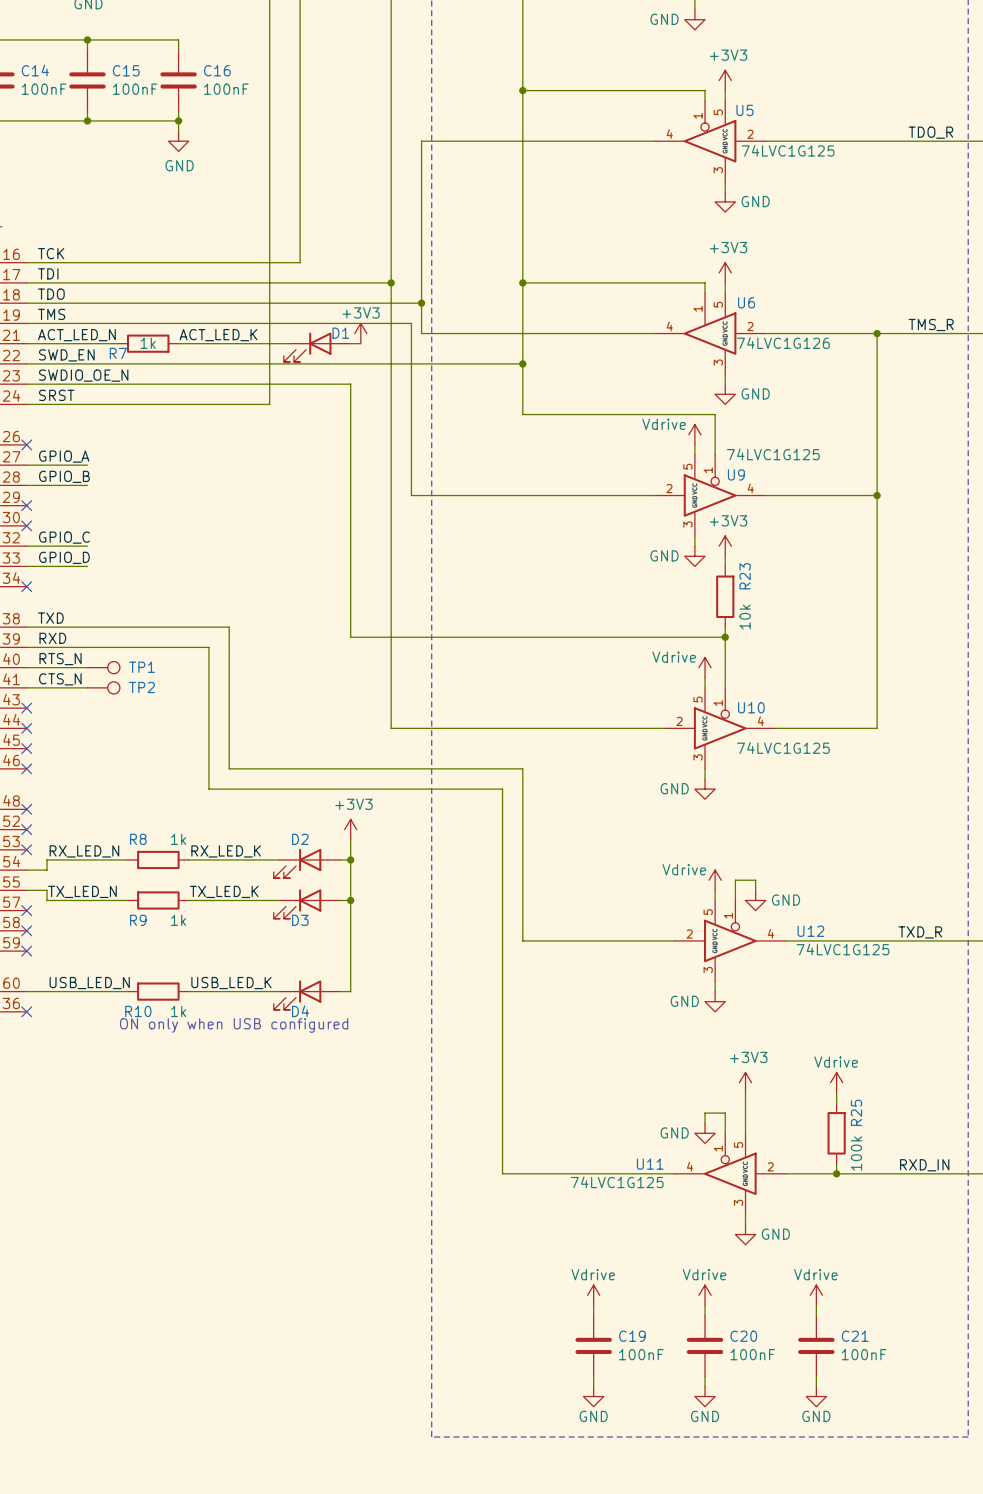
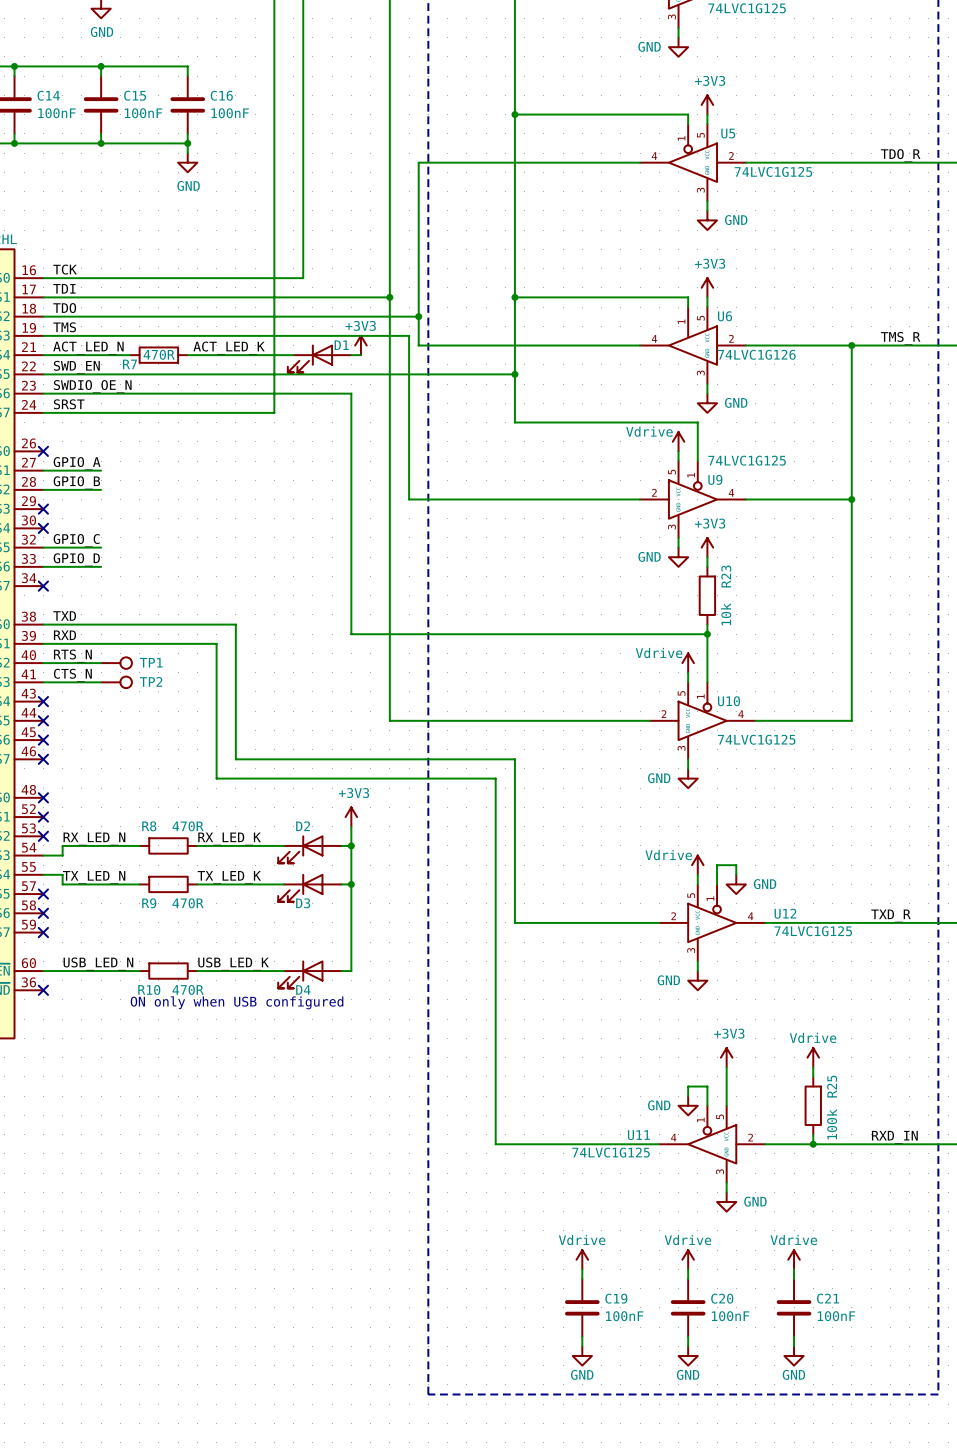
R7 value: 1k (148, 343) -> 470R (159, 354)
R8 value: 1k (178, 839) -> 470R (188, 826)
R9 value: 1k (178, 920) -> 470R (188, 903)
R10 value: 1k (178, 1011) -> 470R (188, 989)

